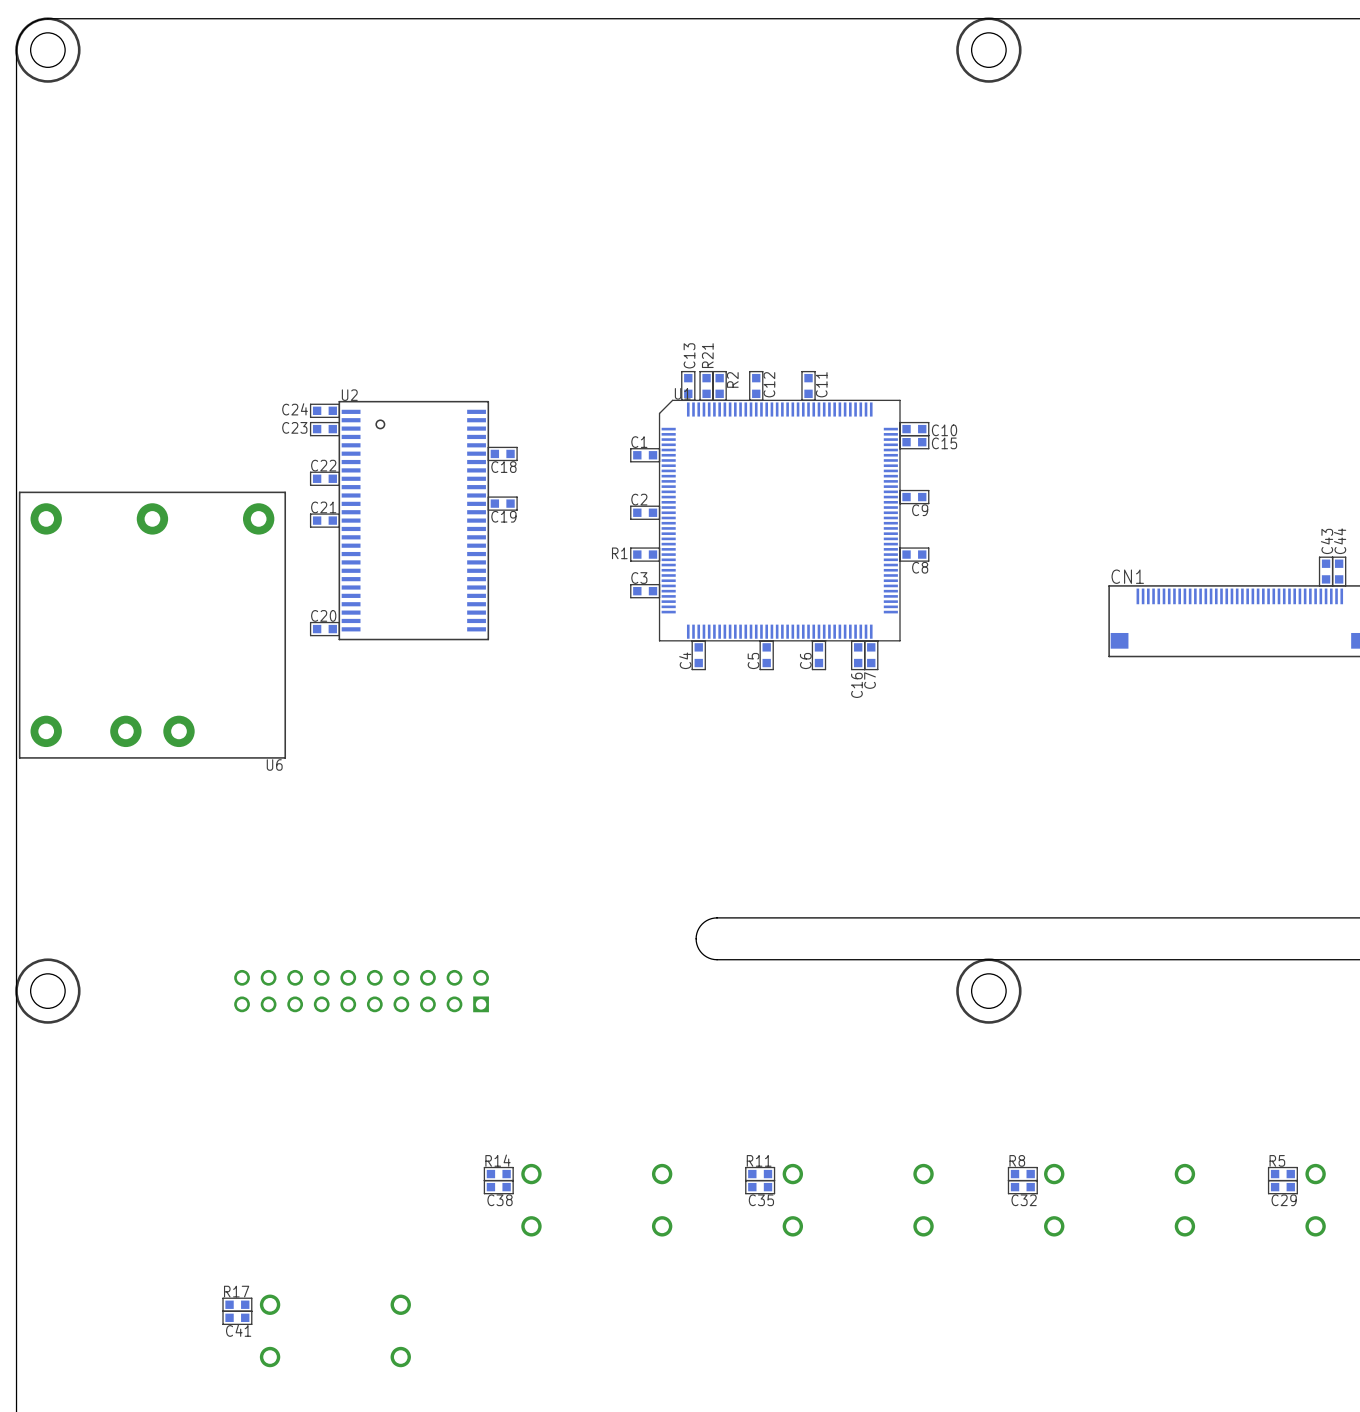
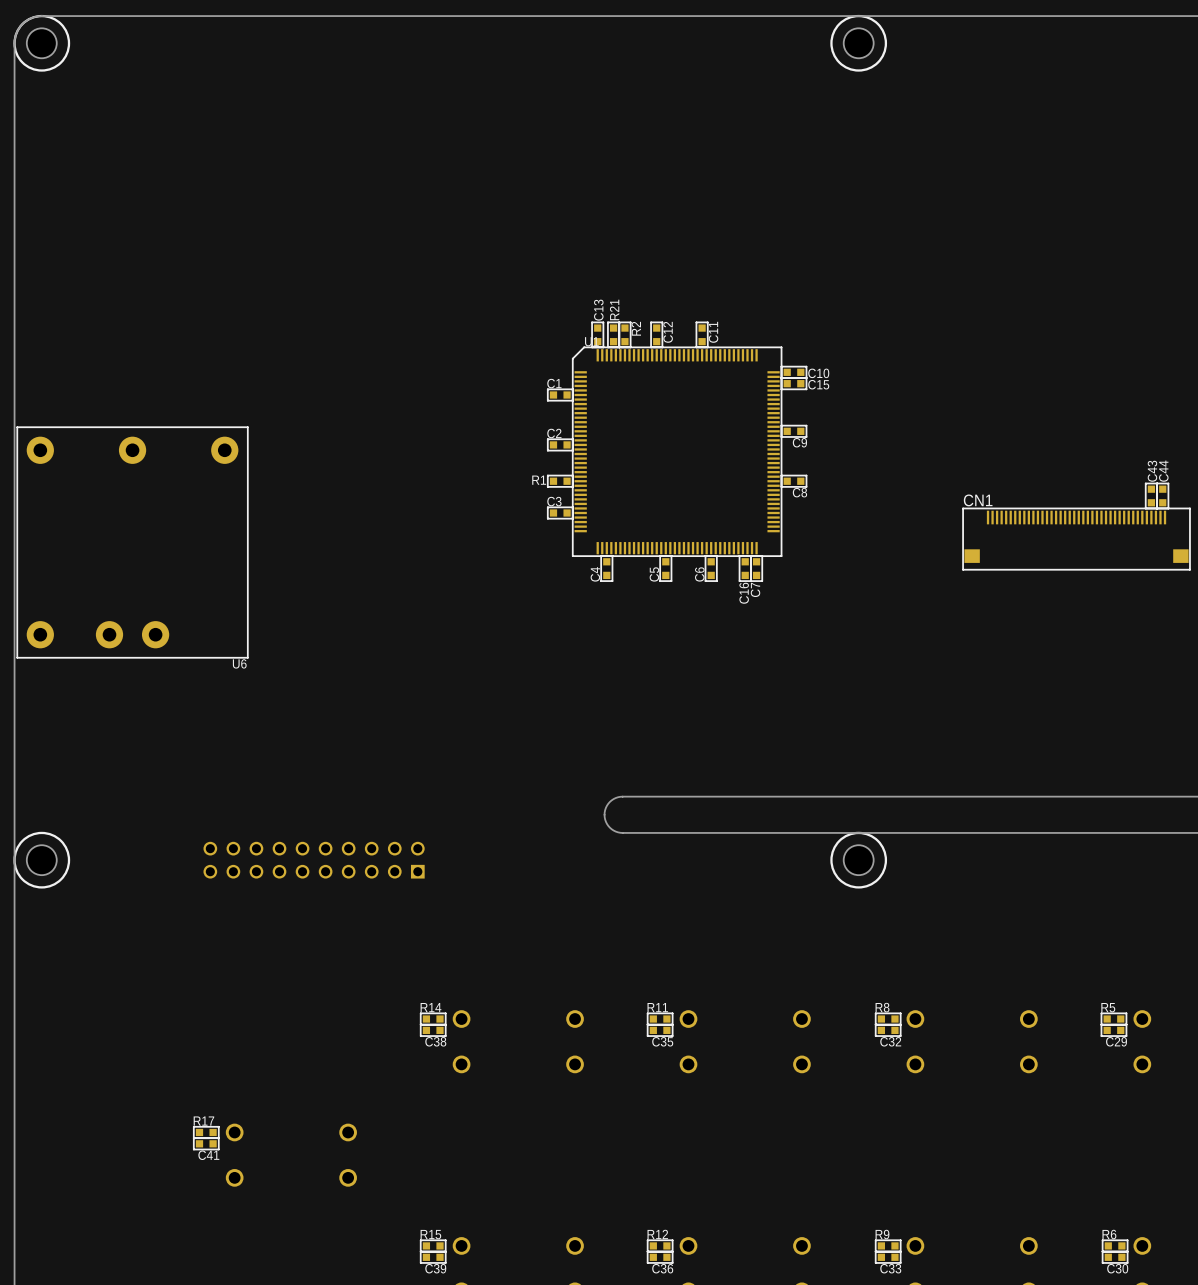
C24: (324, 410) -> none
C23: (324, 429) -> none
C18: (502, 453) -> none
C22: (324, 478) -> none
C19: (502, 503) -> none
C21: (324, 520) -> none
U2: (413, 520) -> none
C20: (324, 629) -> none

